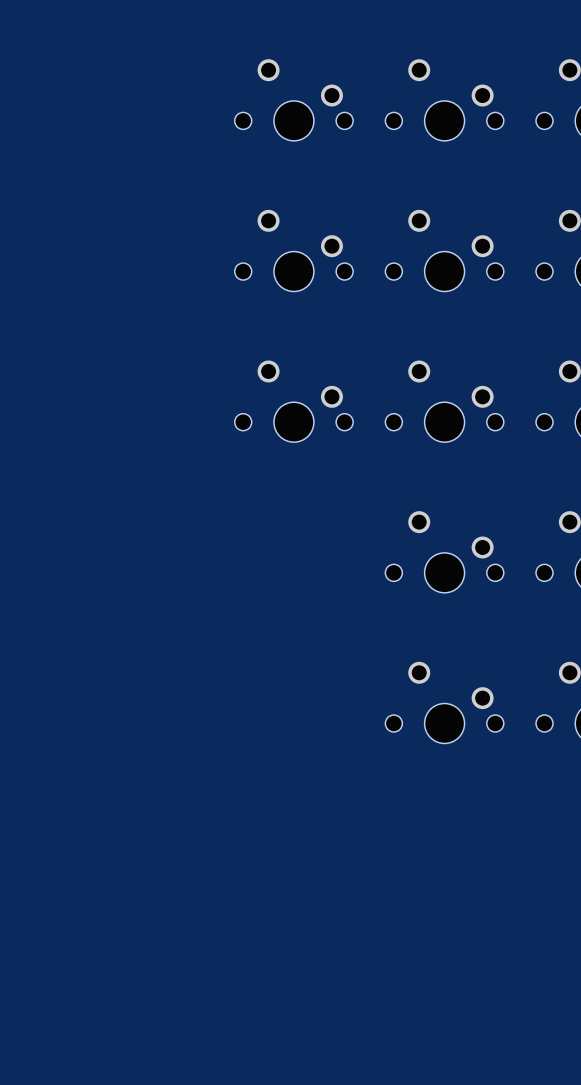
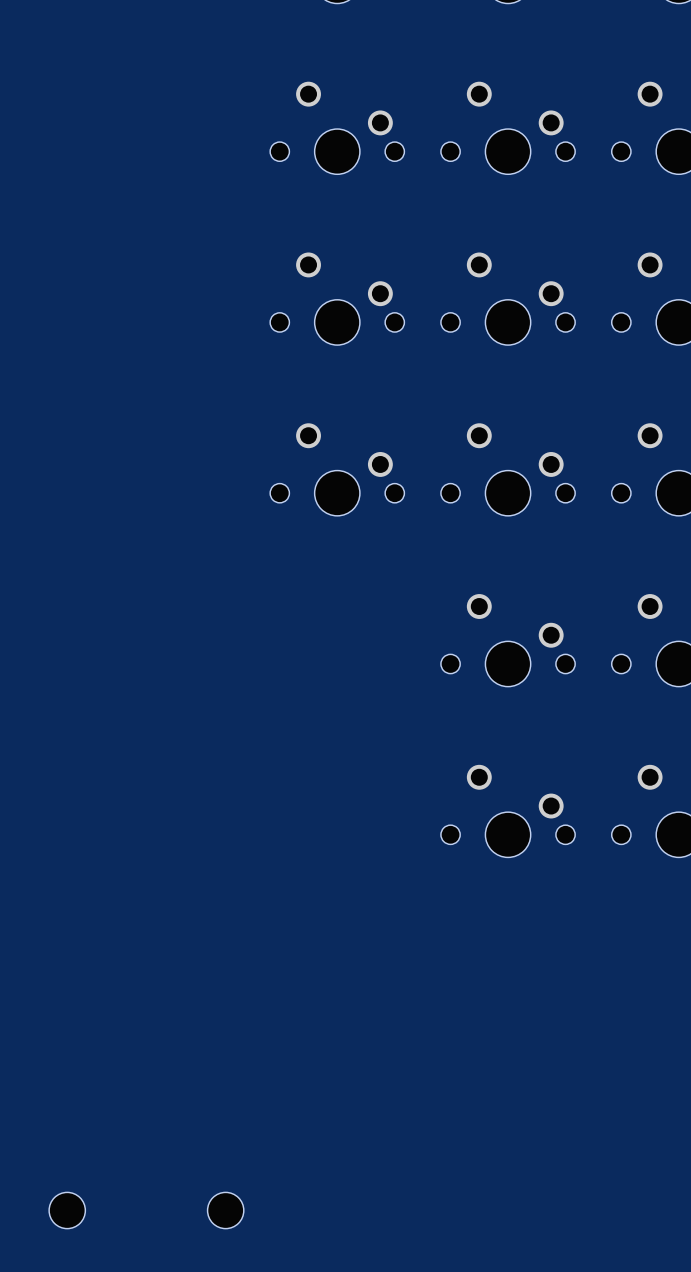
part: none -> (67, 1210)
part: none -> (225, 1210)

